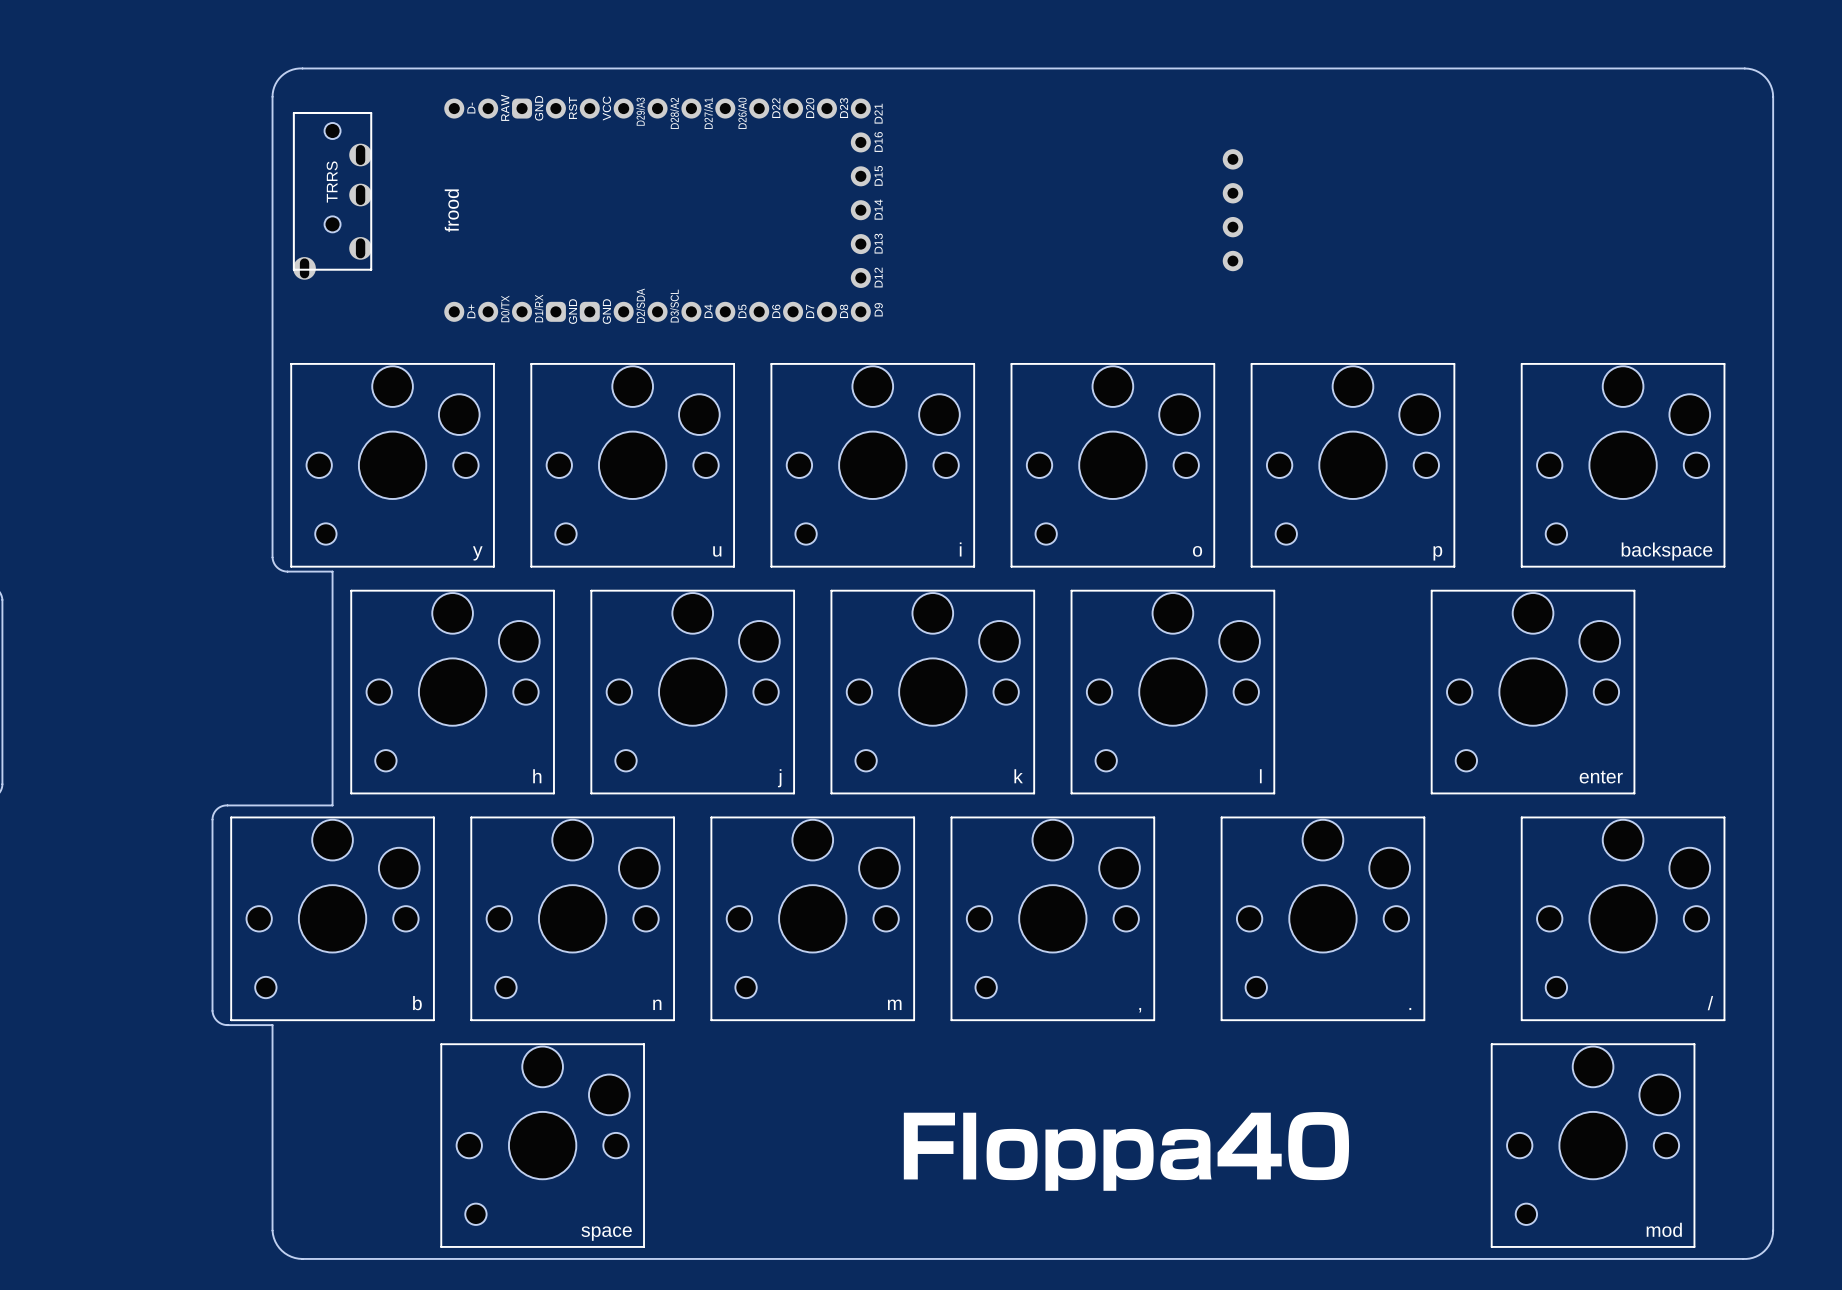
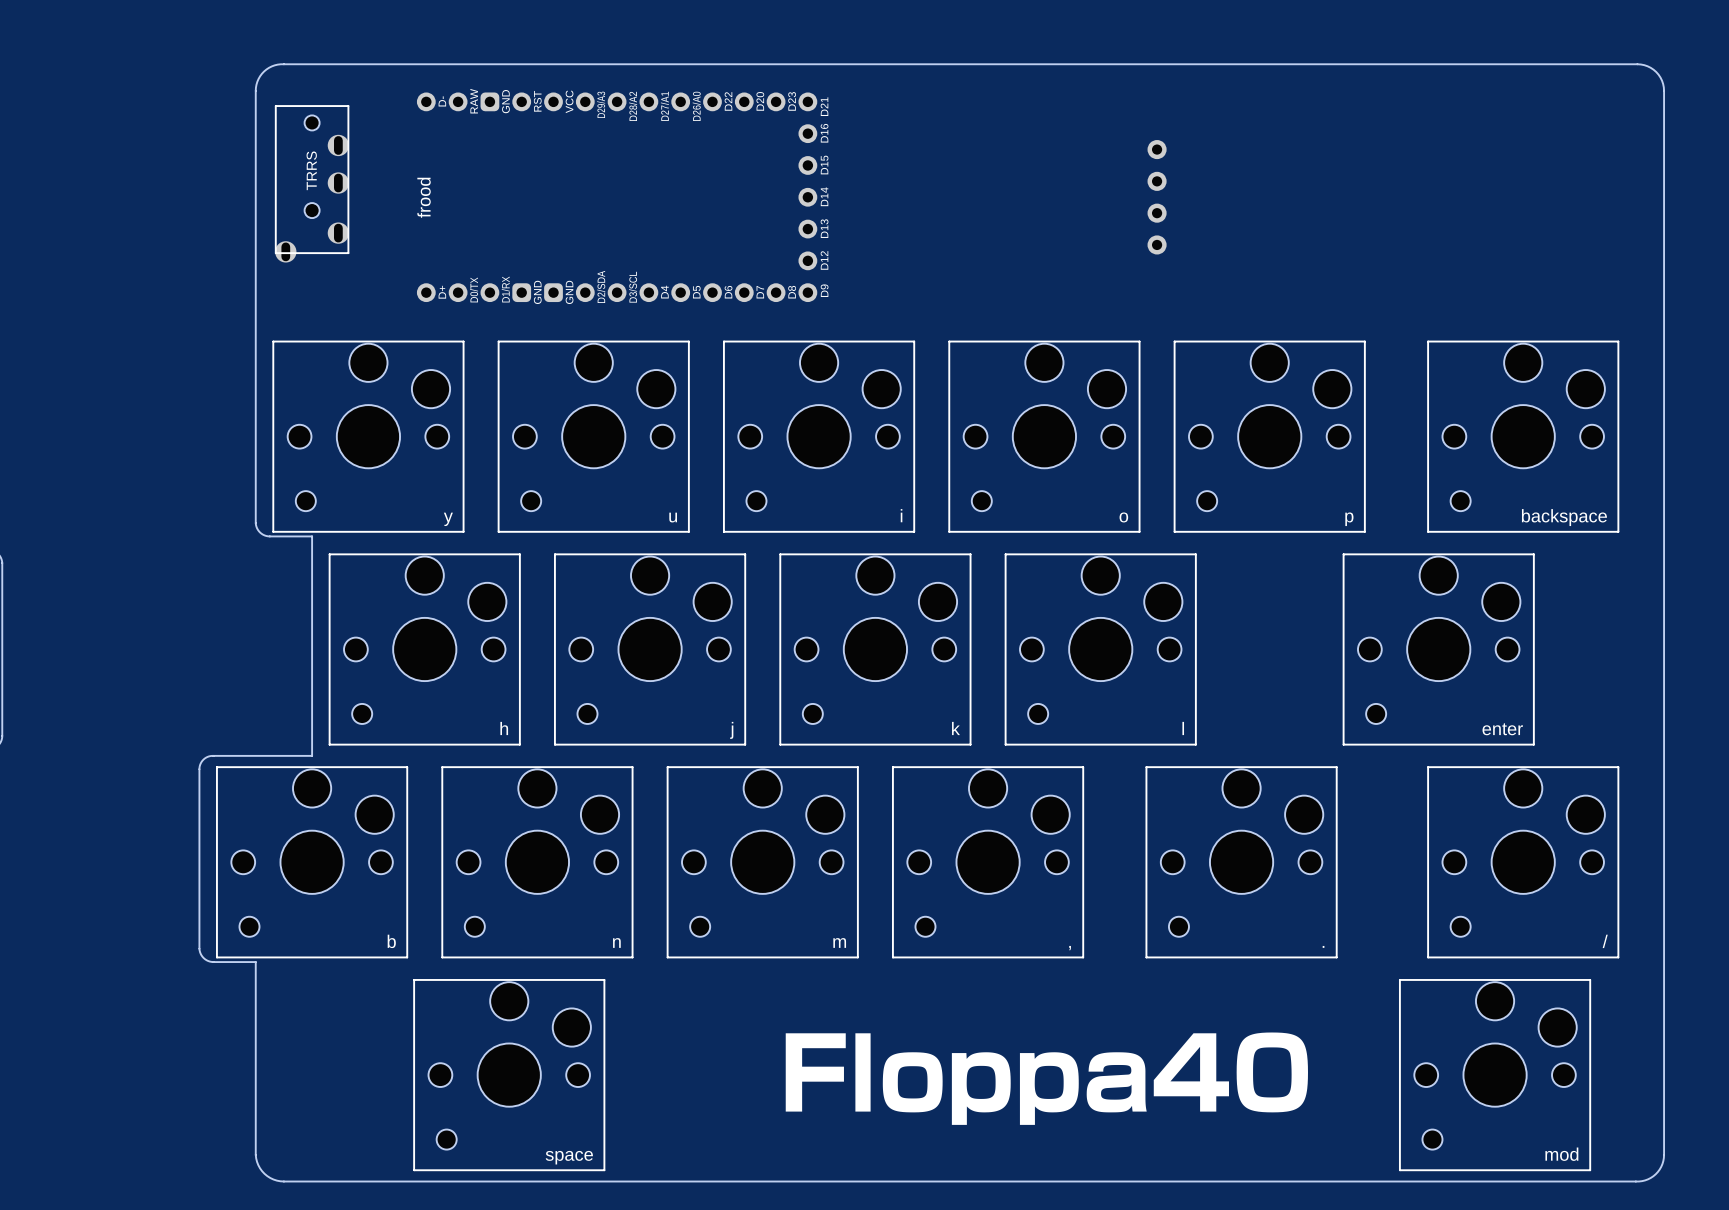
drawing: none -> [1153, 1032, 1308, 1113]
drawing: none -> [785, 1033, 846, 1112]
drawing shape: [903, 1112, 955, 1180] -> [855, 1033, 871, 1112]
drawing shape: [963, 1112, 977, 1180] -> [882, 1052, 943, 1113]
drawing: [1217, 1112, 1350, 1181] -> none
drawing: none -> [951, 1052, 1011, 1125]
drawing: [986, 1128, 1096, 1191] -> none
drawing shape: [1103, 1128, 1154, 1191] -> [1019, 1052, 1079, 1125]
drawing shape: [1160, 1128, 1212, 1181] -> [1086, 1052, 1147, 1113]

